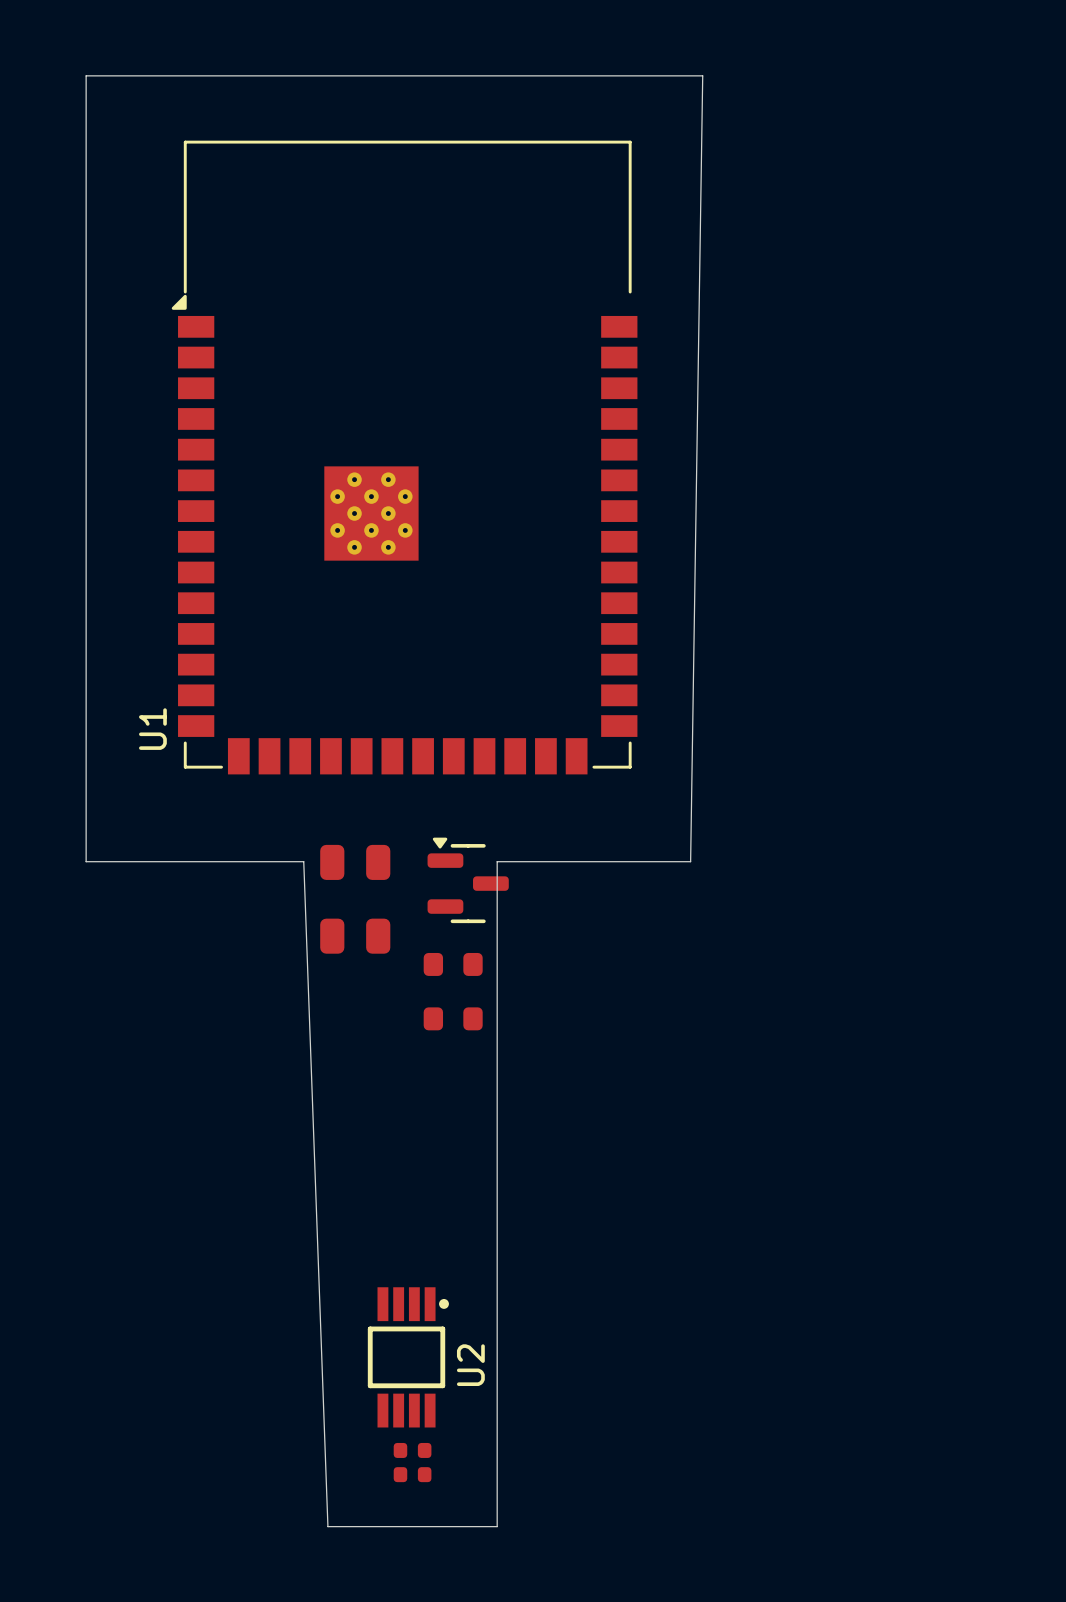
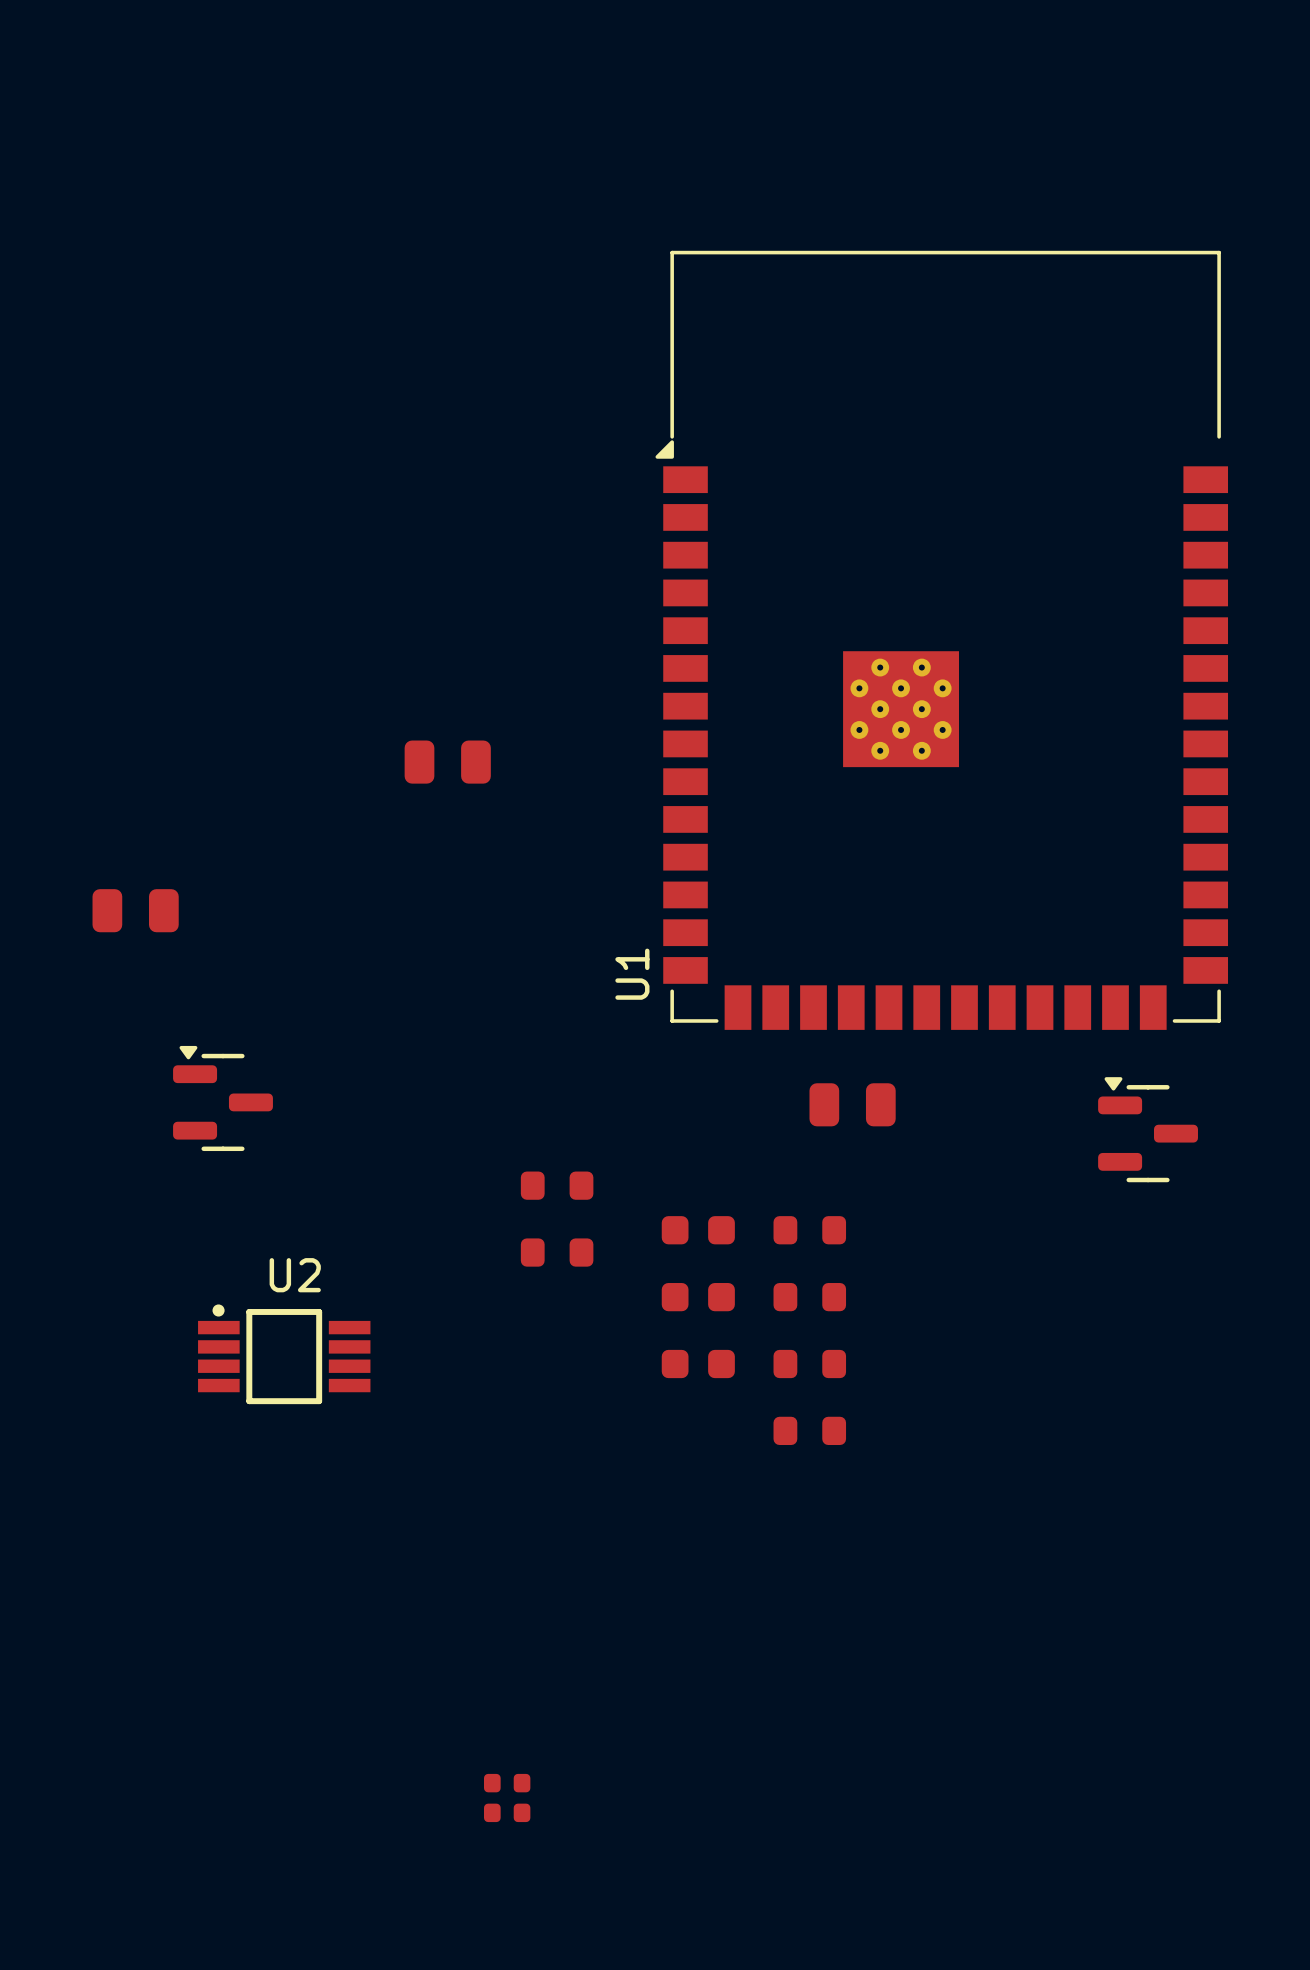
board edge: (86, 75) (86, 861) (303, 861) (327, 1526) (497, 1526) (497, 861) (690, 861) (702, 75) (86, 75) -> none
U1 position: (404, 457) -> (941, 640)
part: none -> (447, 762)
part: none -> (135, 910)
part: (355, 862) -> none
part: (468, 880) -> none
part: none -> (223, 1098)
part: none -> (852, 1104)
part: none -> (1148, 1129)
part: (355, 936) -> none
part: none -> (698, 1230)
part: none -> (809, 1230)
part: none -> (698, 1297)
part: none -> (809, 1297)
part: none -> (698, 1364)
part: none -> (809, 1364)
part: none -> (809, 1430)
U2 rotation: 0° (408, 1357) -> 90° counterclockwise (284, 1354)
U2 position: (408, 1357) -> (284, 1354)

